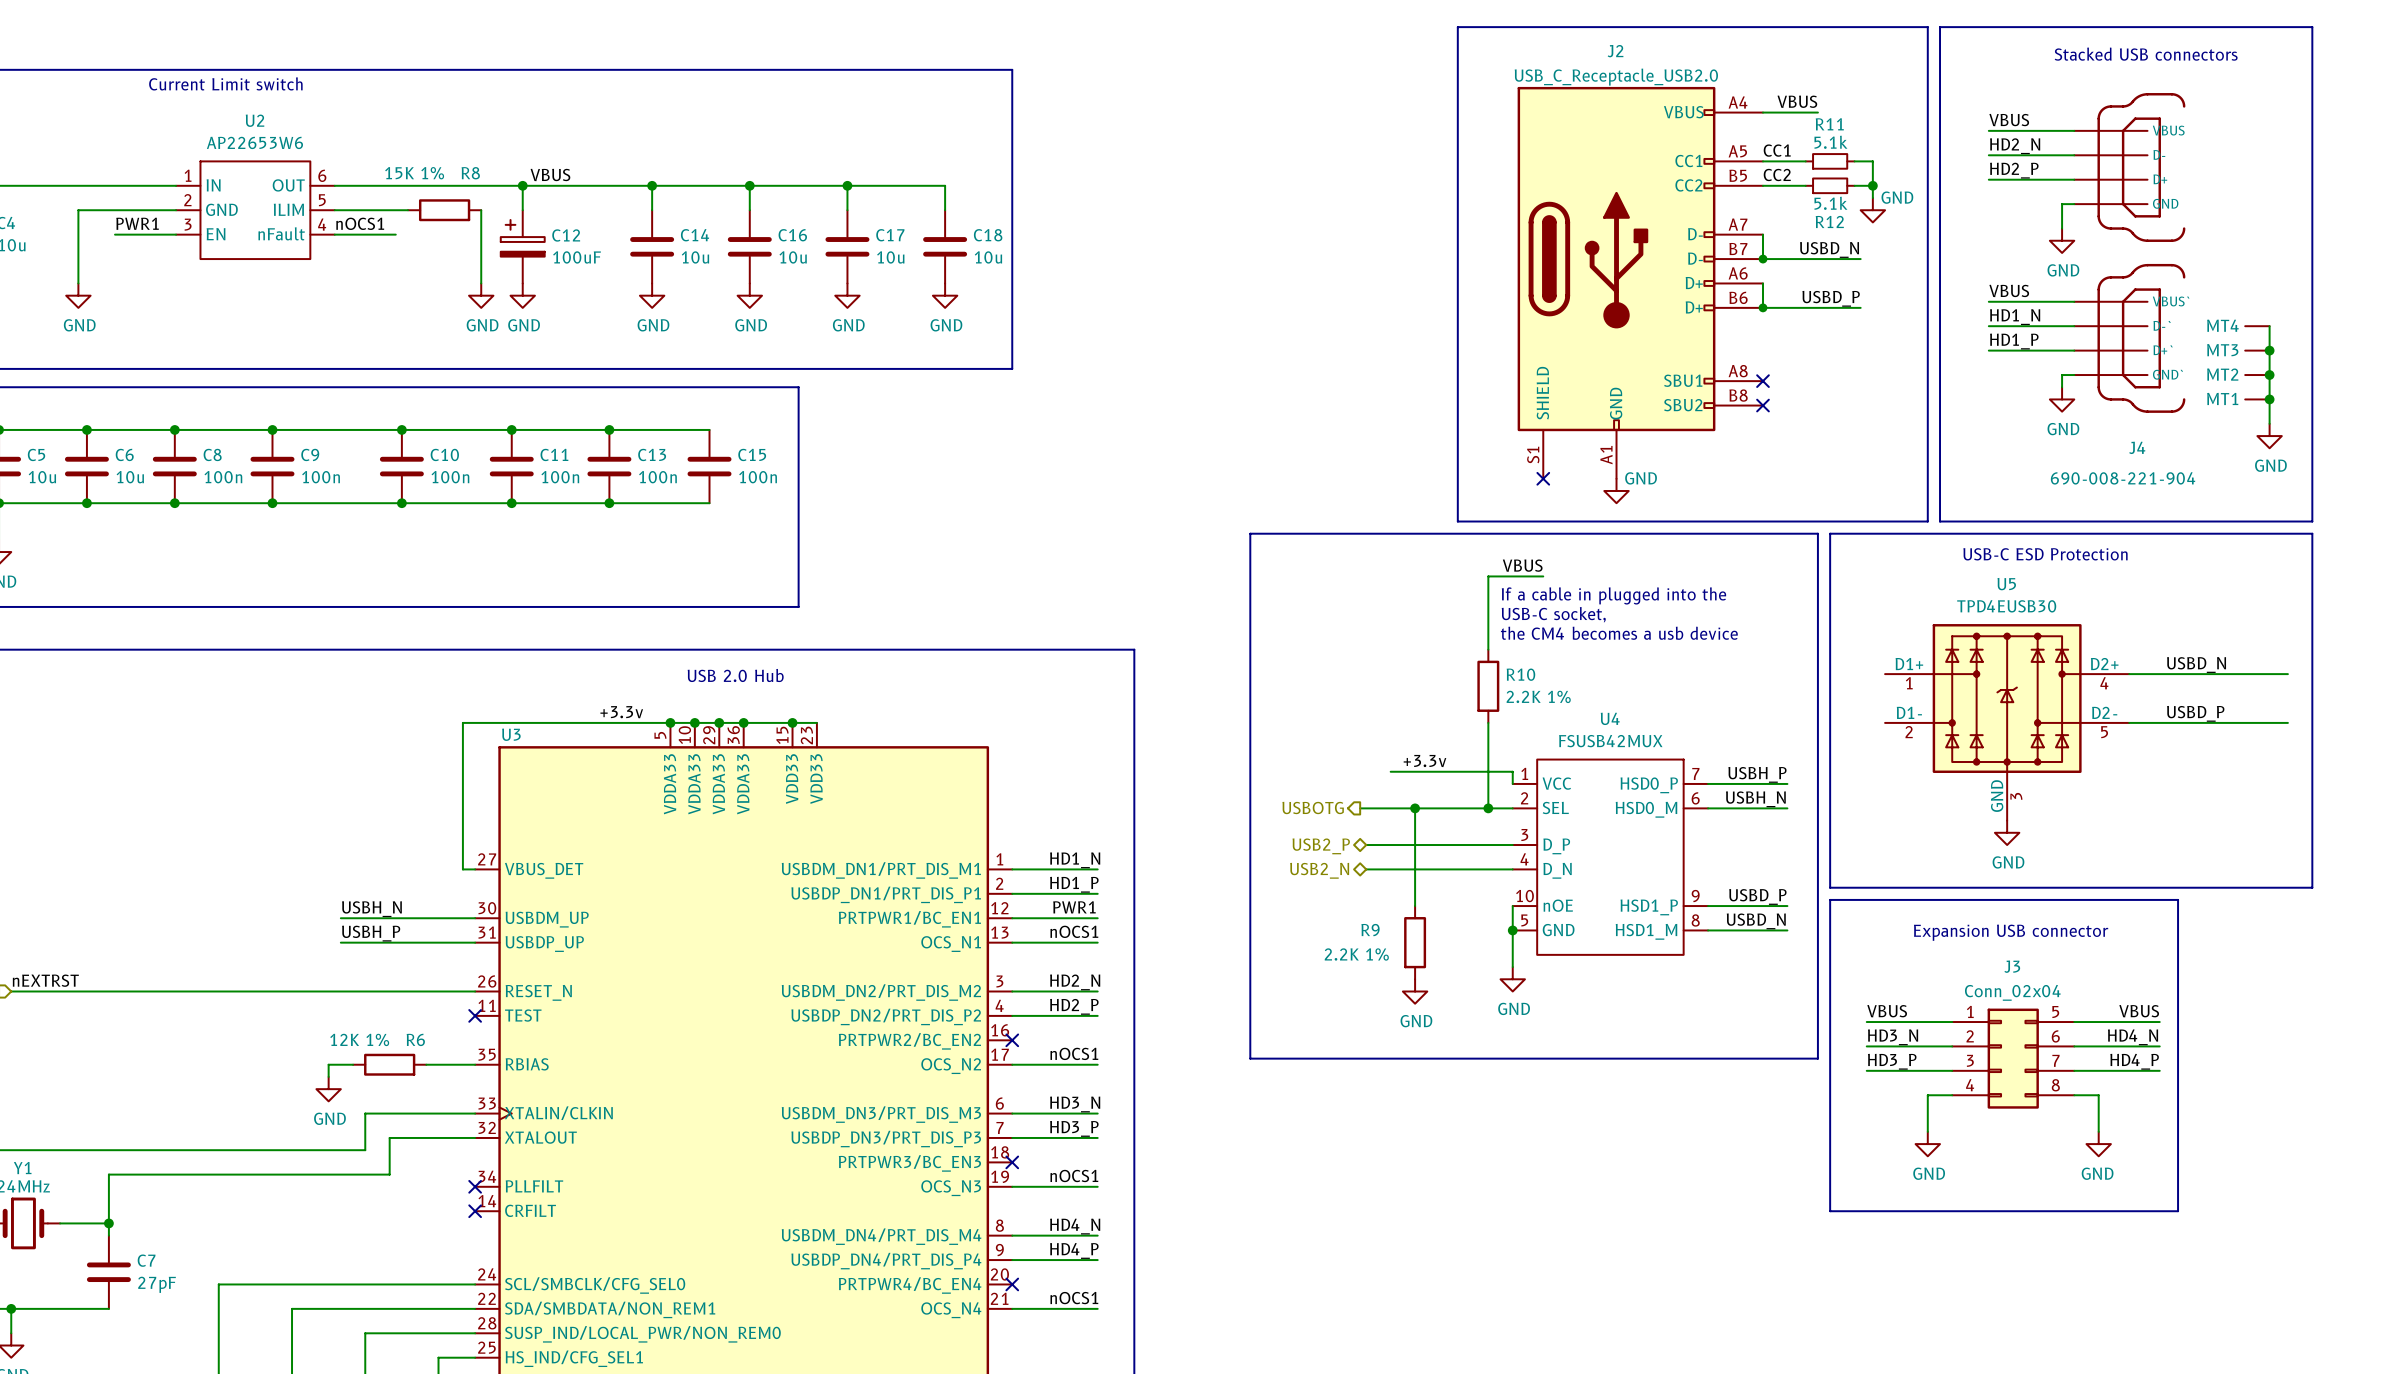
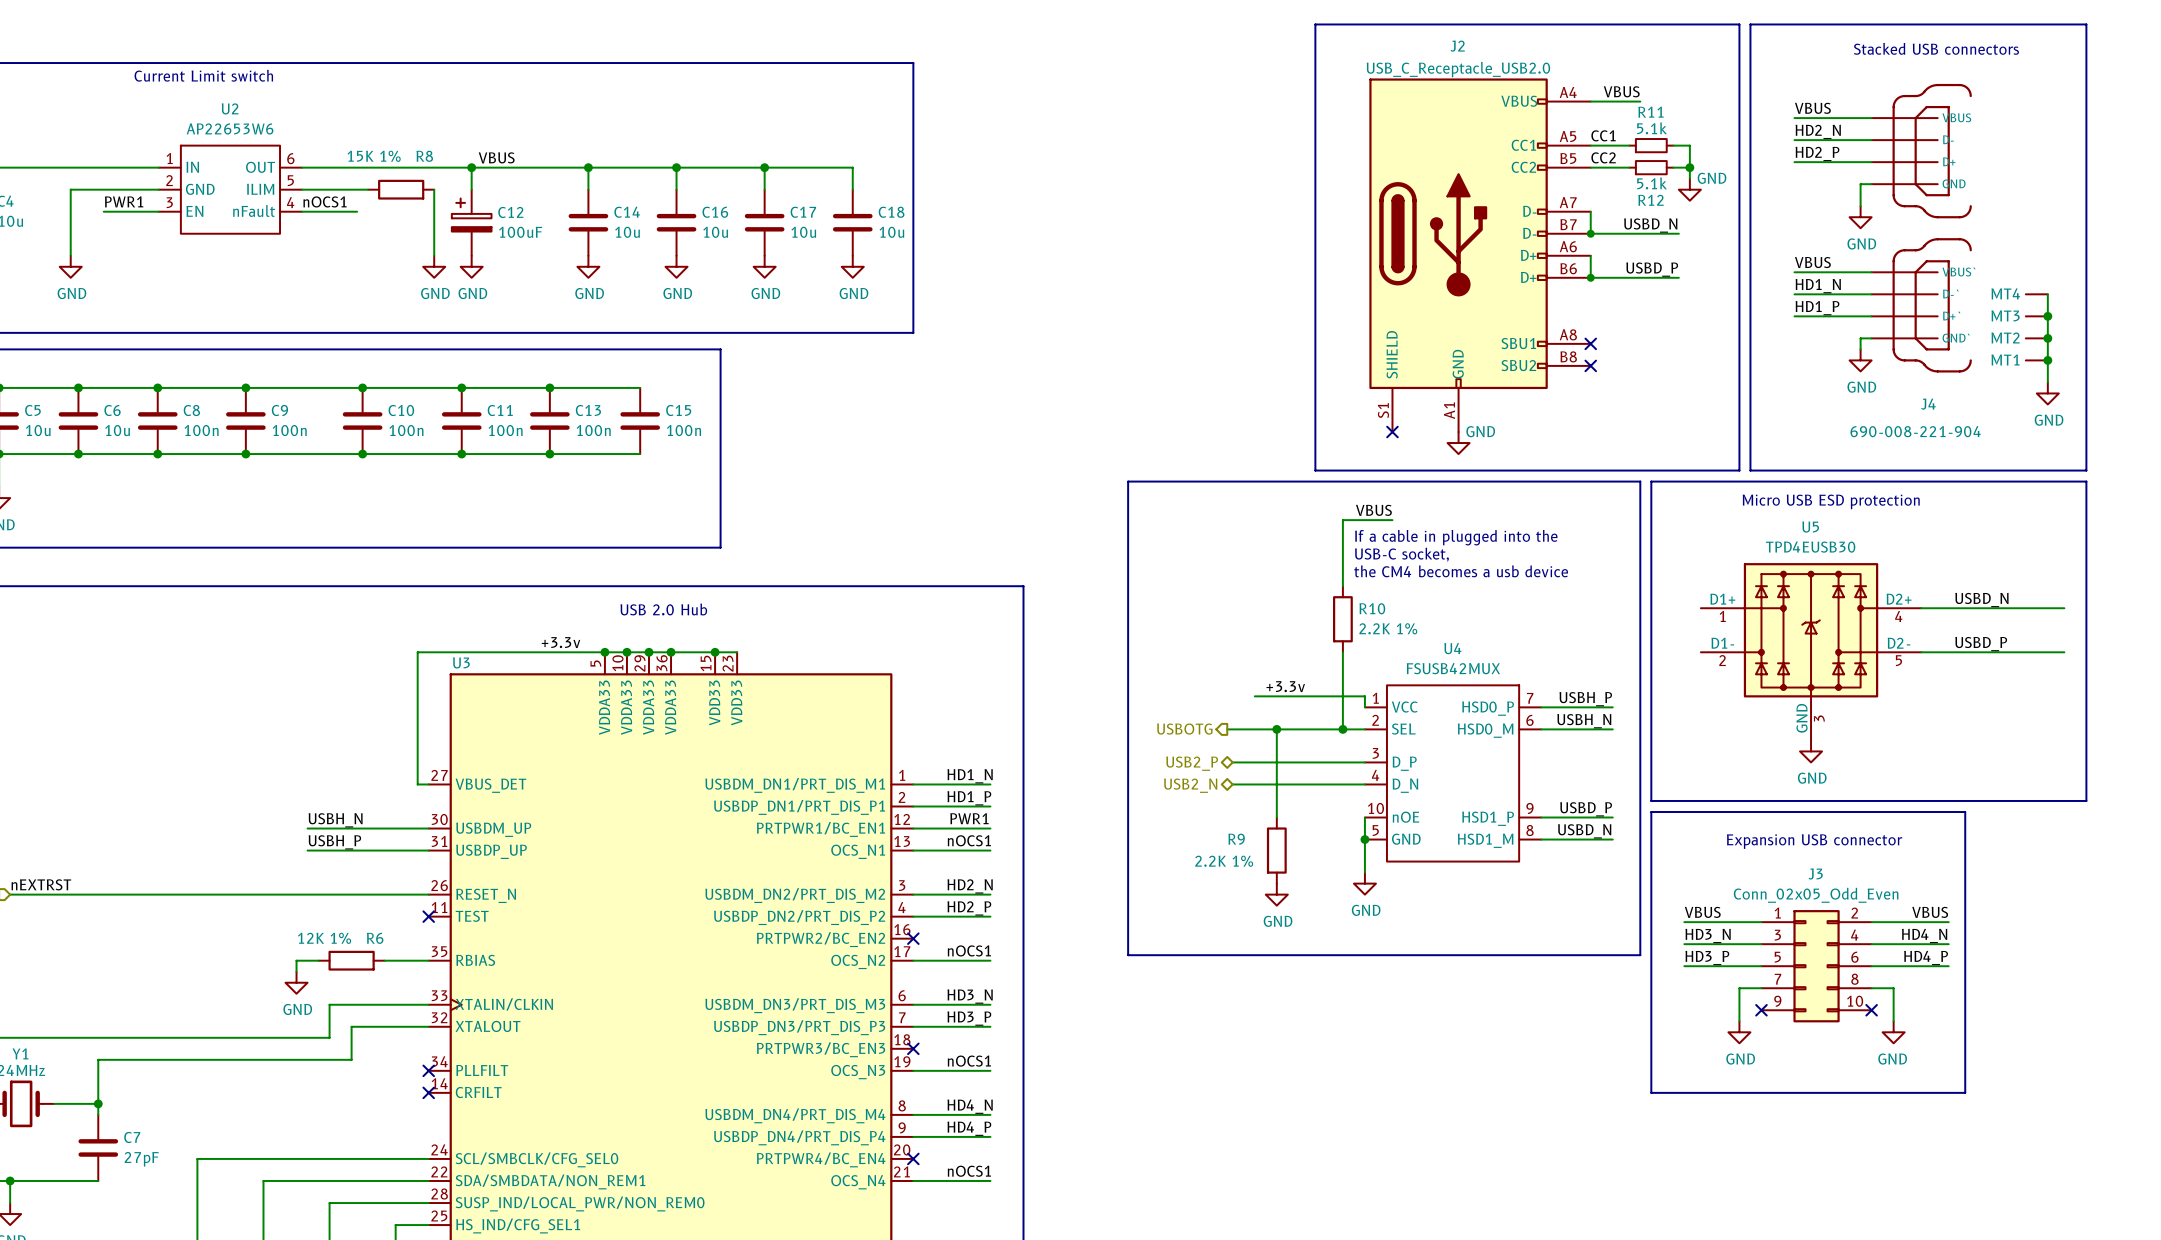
text: USB-C ESD Protection (2045, 554) -> Micro USB ESD protection (1831, 501)
J3 value: Conn_02x04 (2012, 992) -> Conn_02x05_Odd_Even (1816, 895)
J3 symbol: [1952, 1008, 2075, 1109] -> [1761, 910, 1872, 1023]
no-connect mark: none -> (1761, 1010)
no-connect mark: none -> (1871, 1010)

